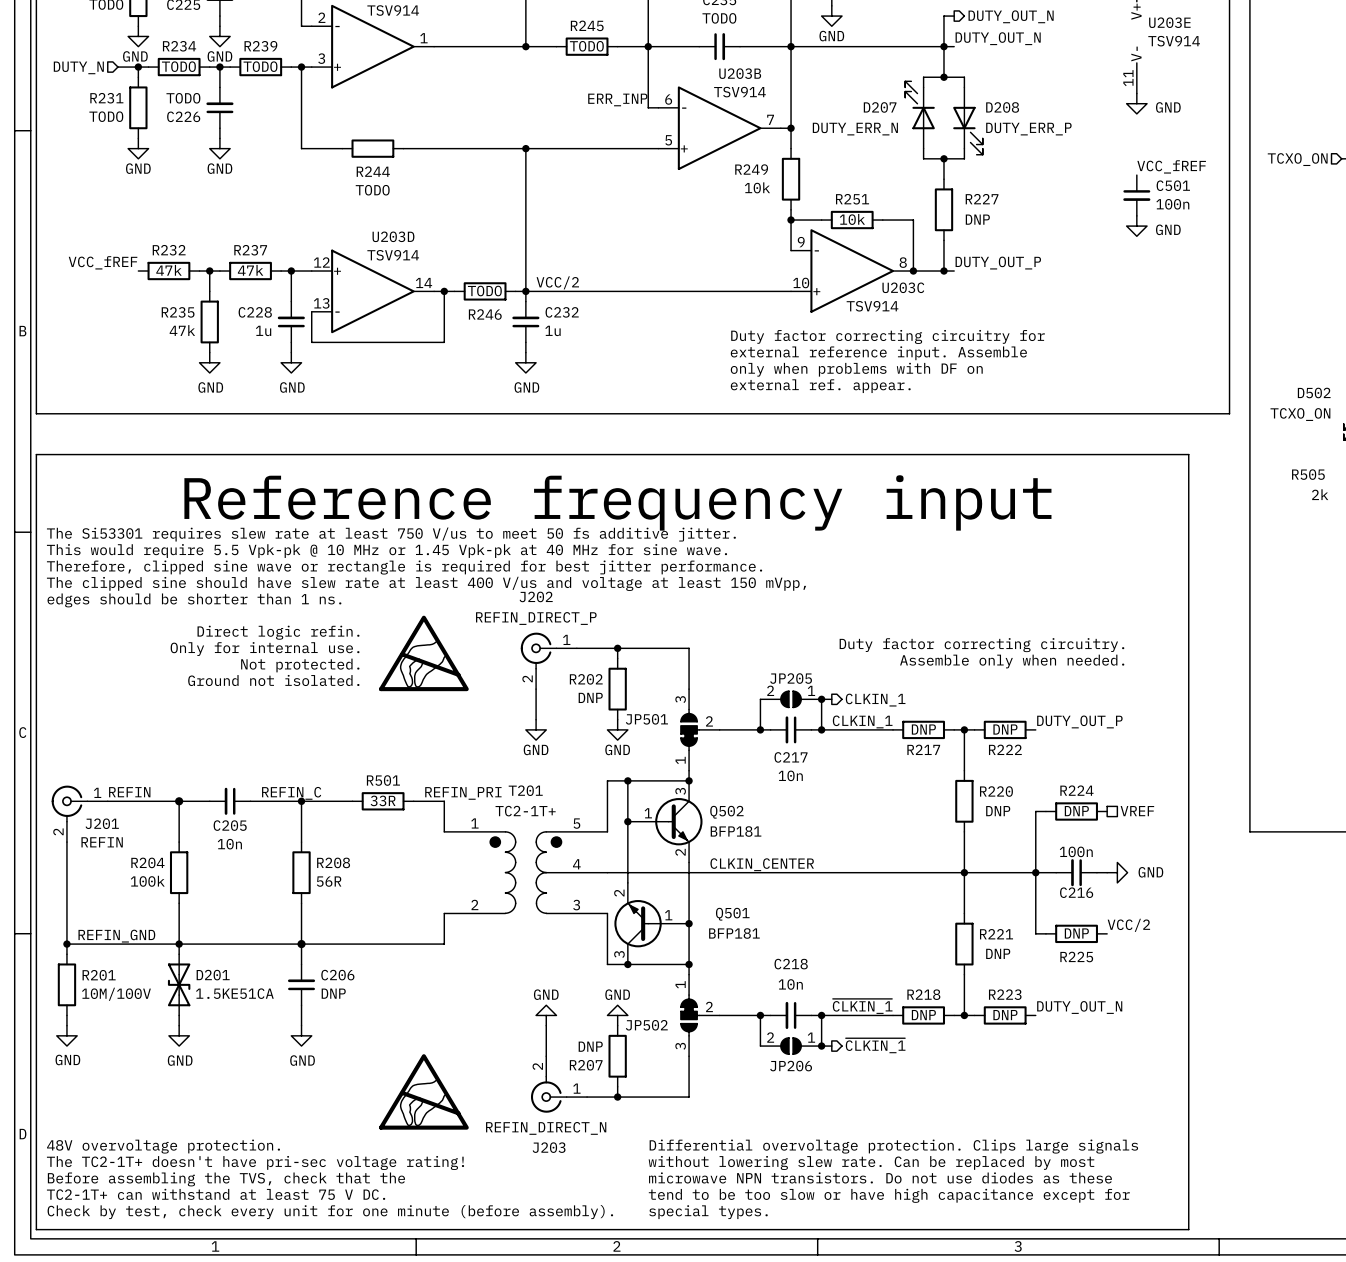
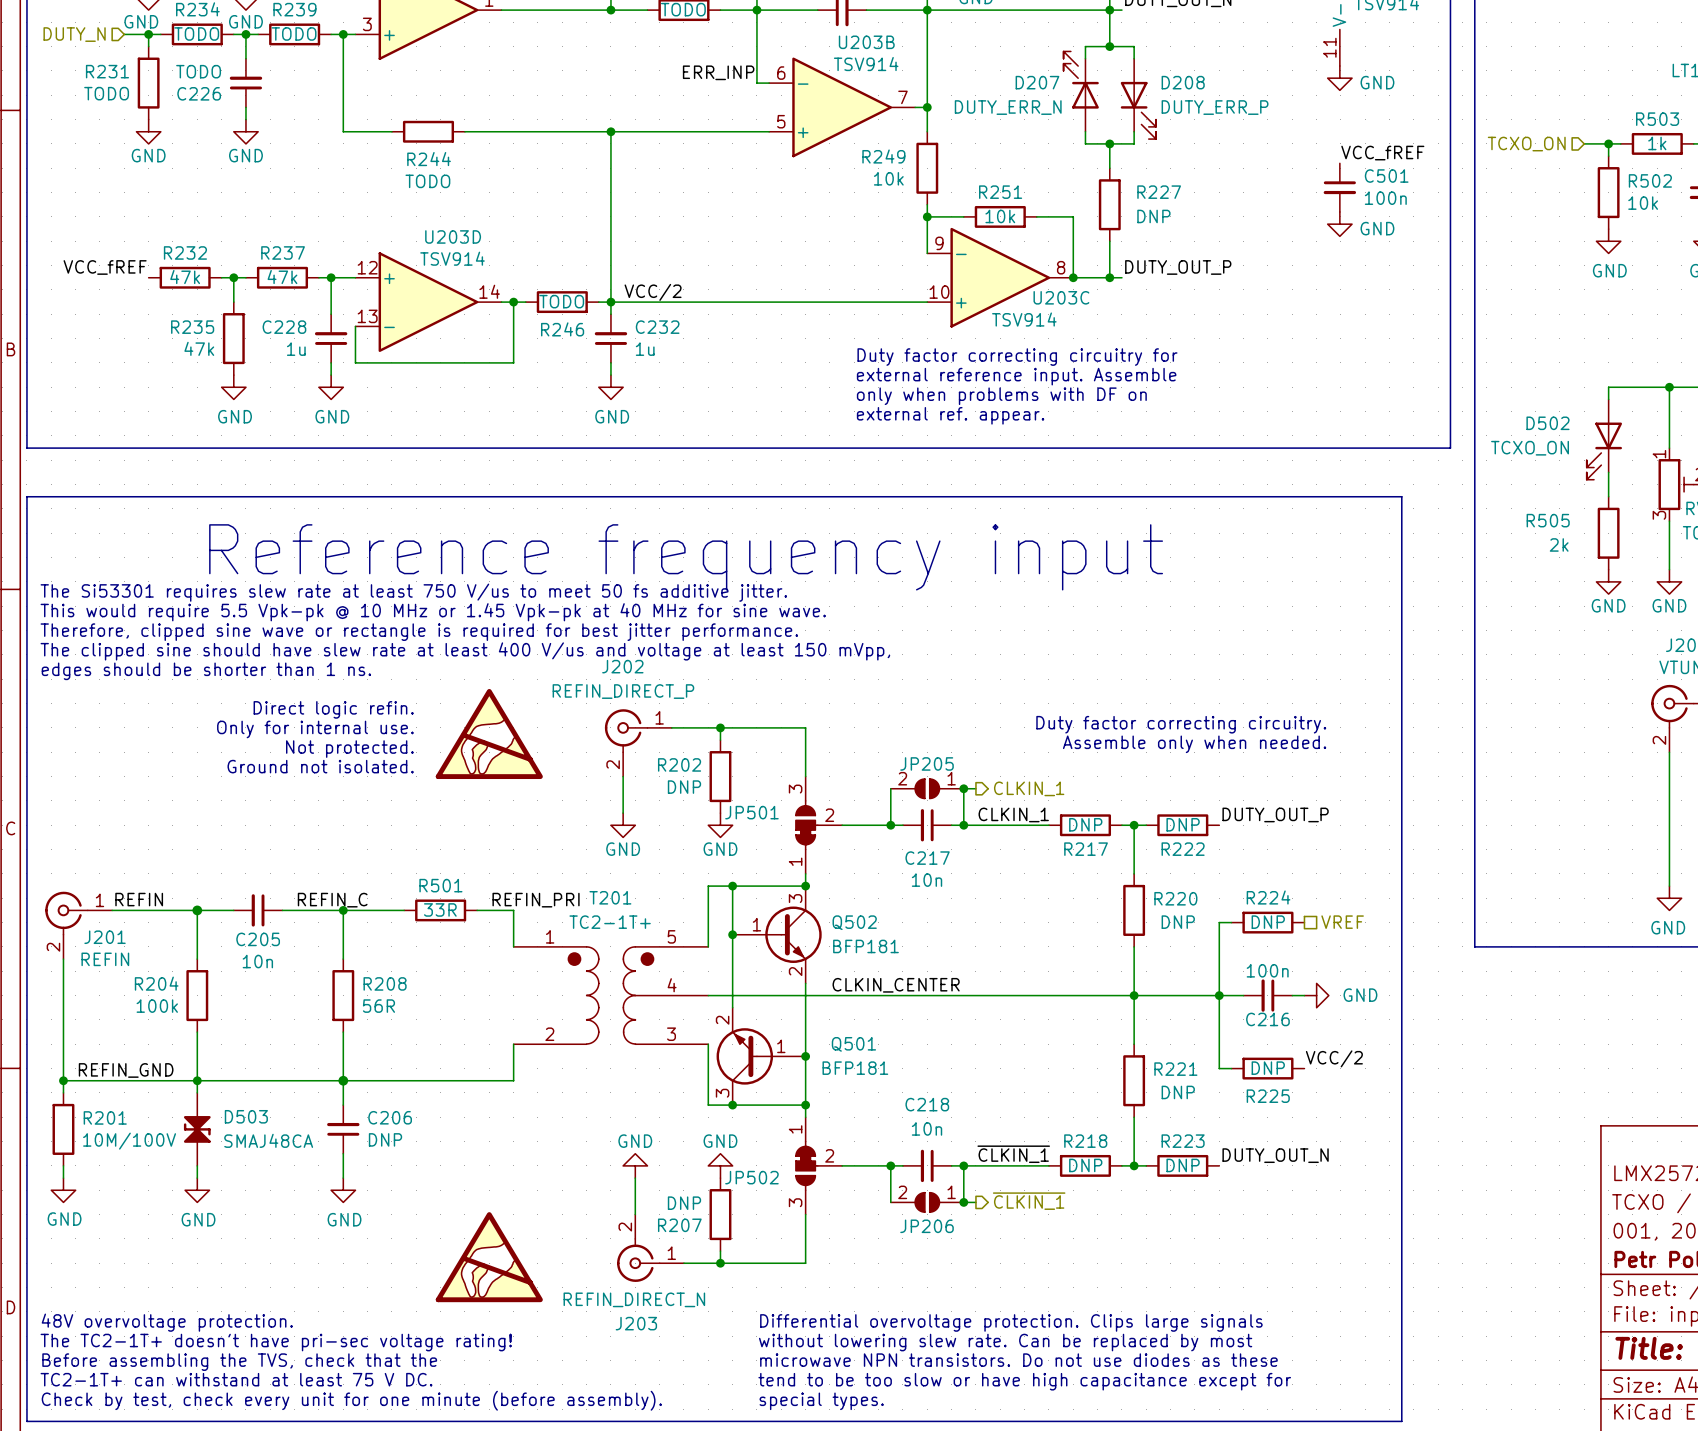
D201: 1.5KE51CA (179, 984) -> none
D503: none -> SMAJ48CA (197, 1129)

